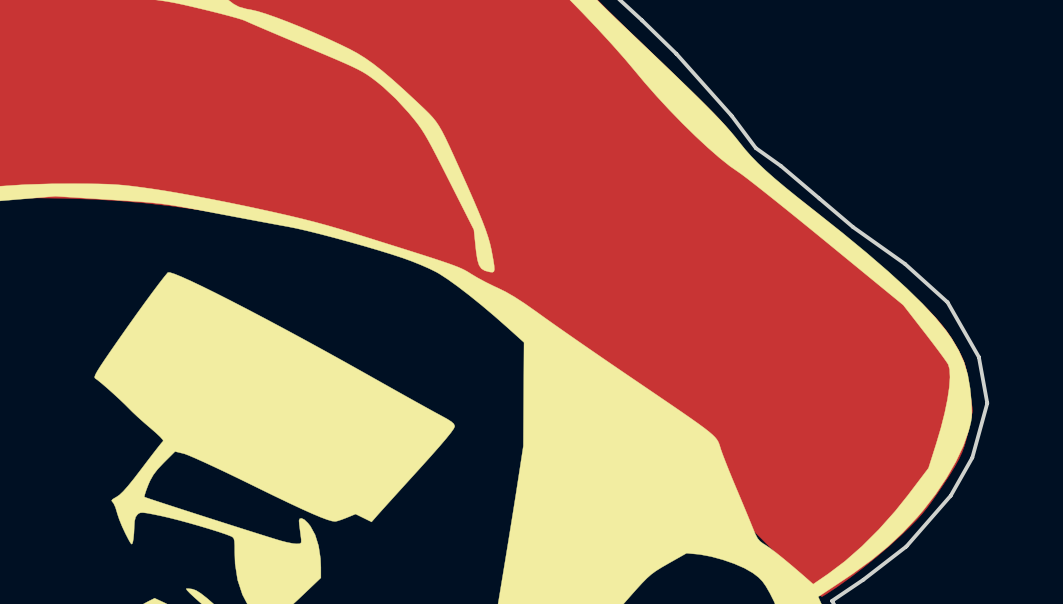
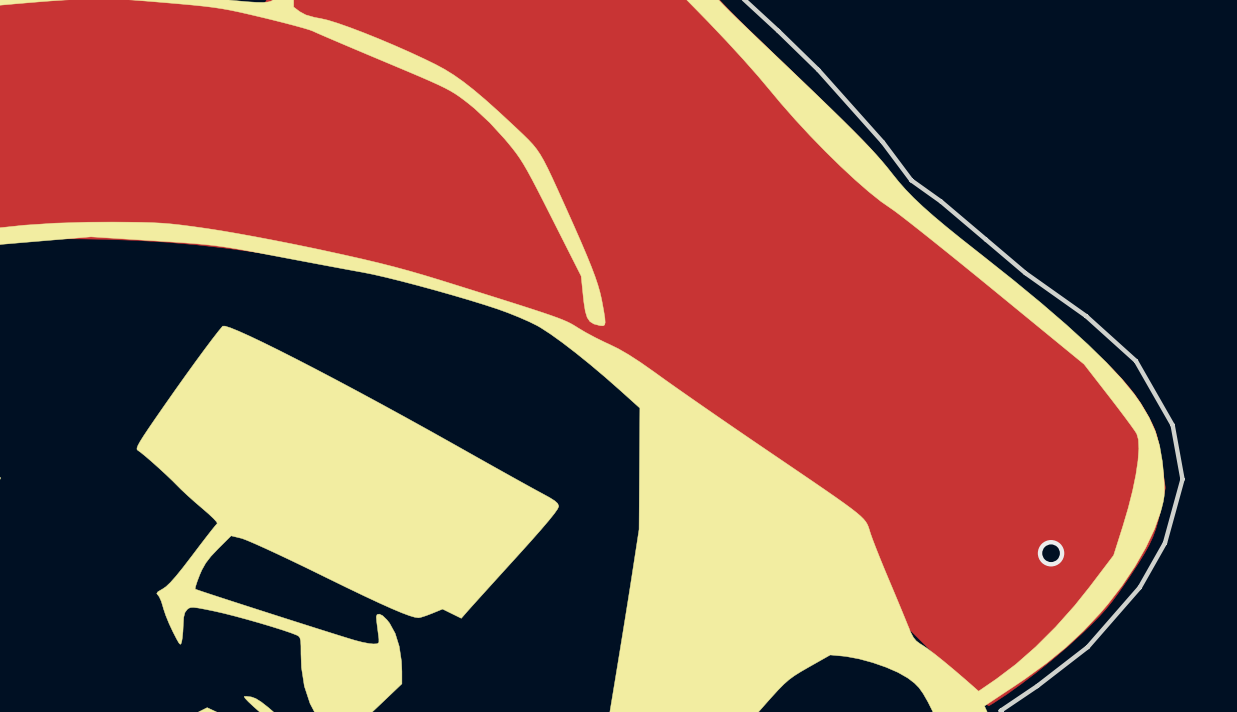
via: none -> (1051, 553)

